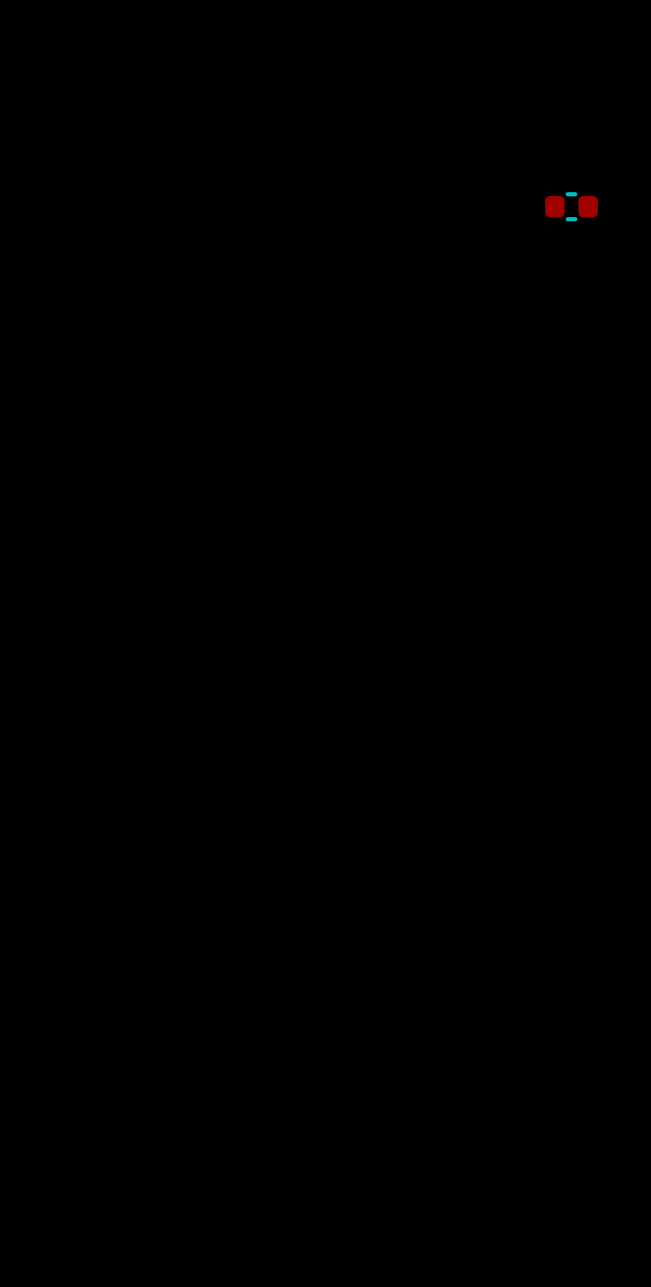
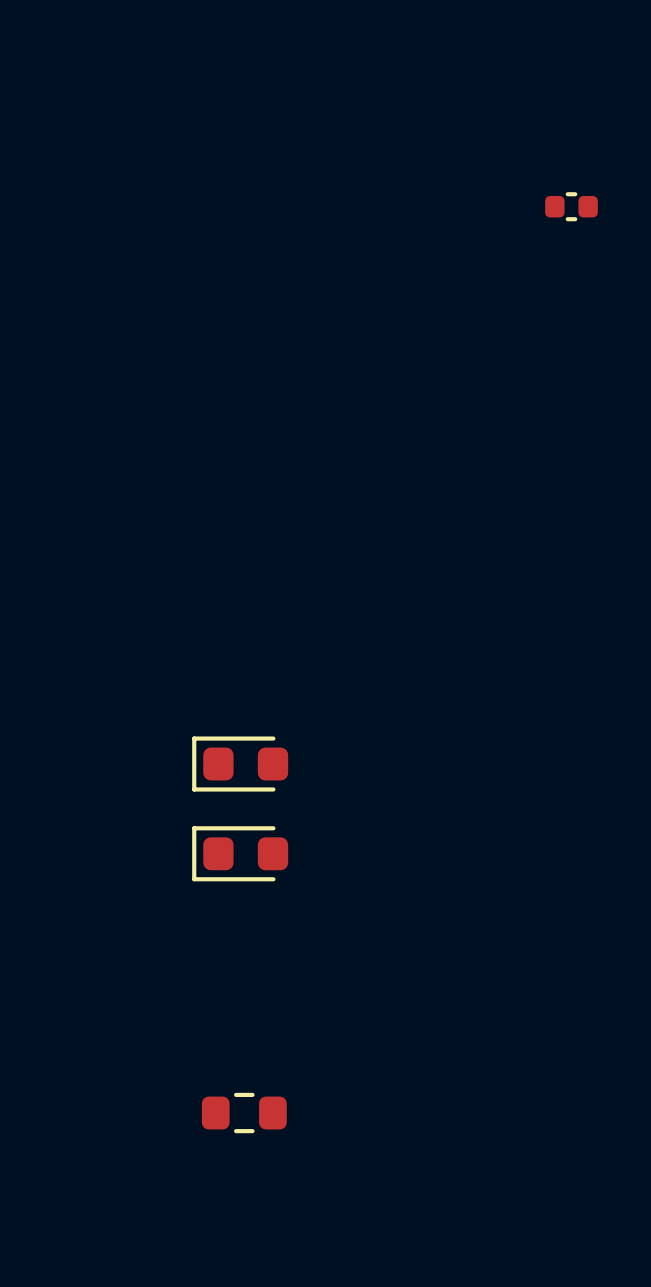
part: none -> (240, 764)
part: none -> (240, 853)
part: none -> (244, 1113)

